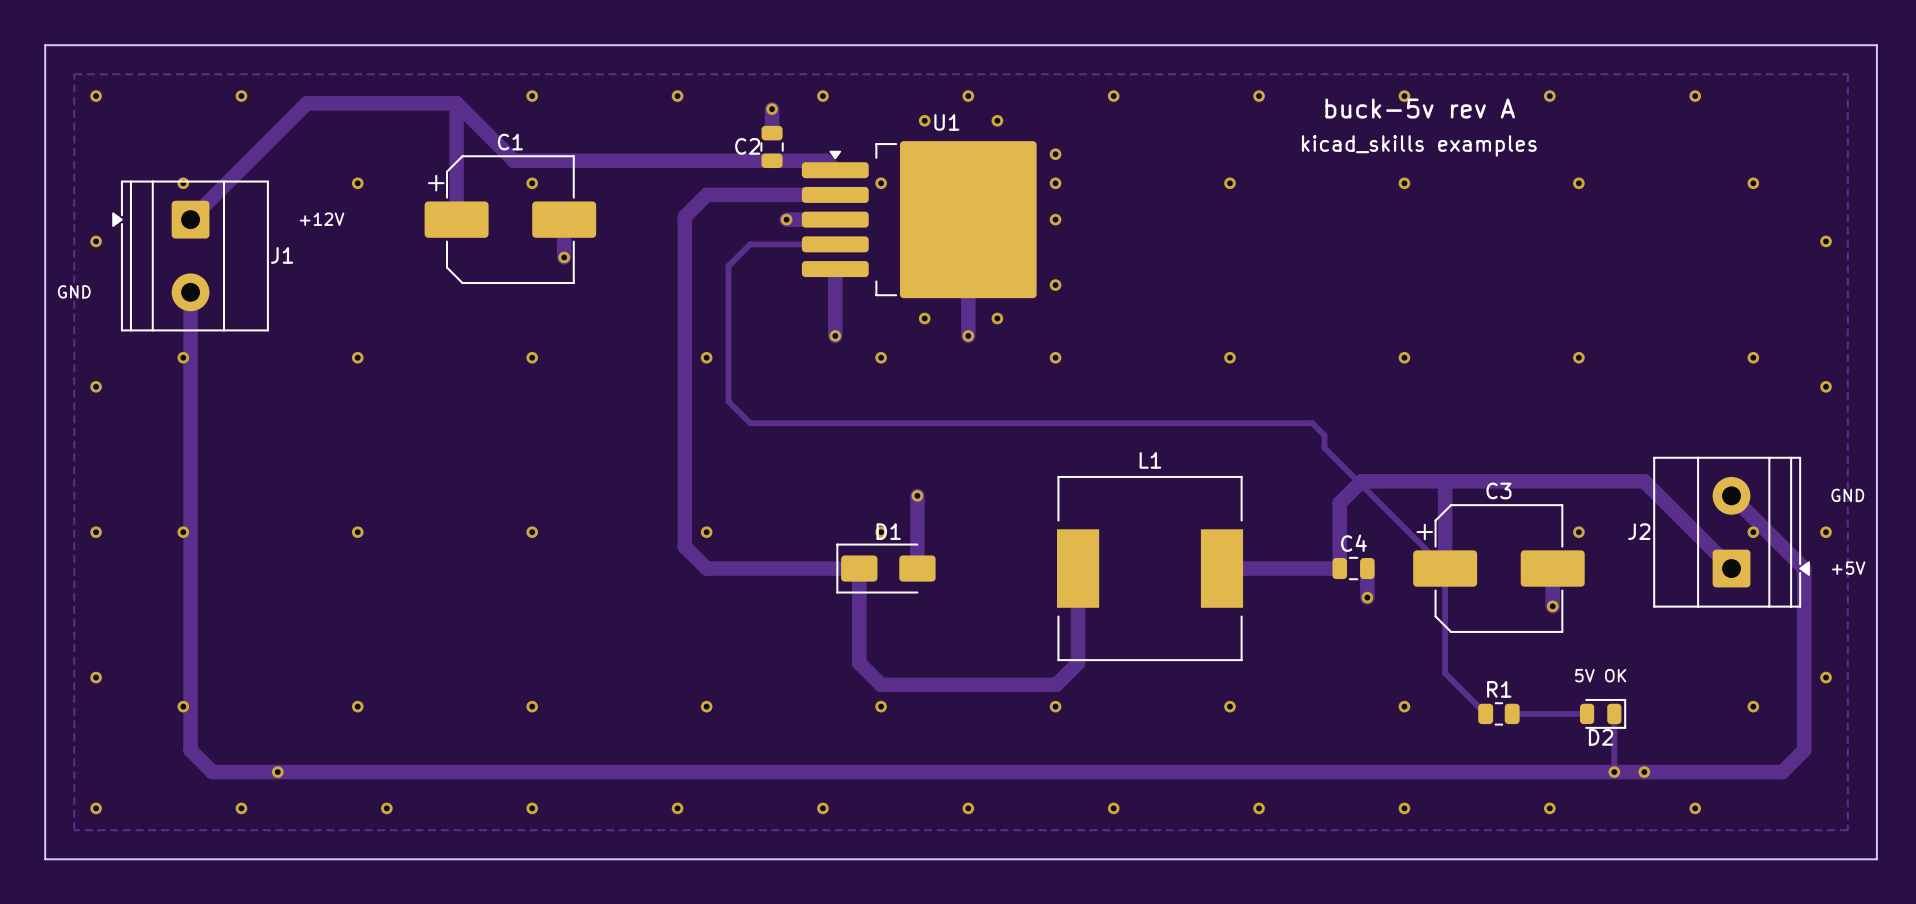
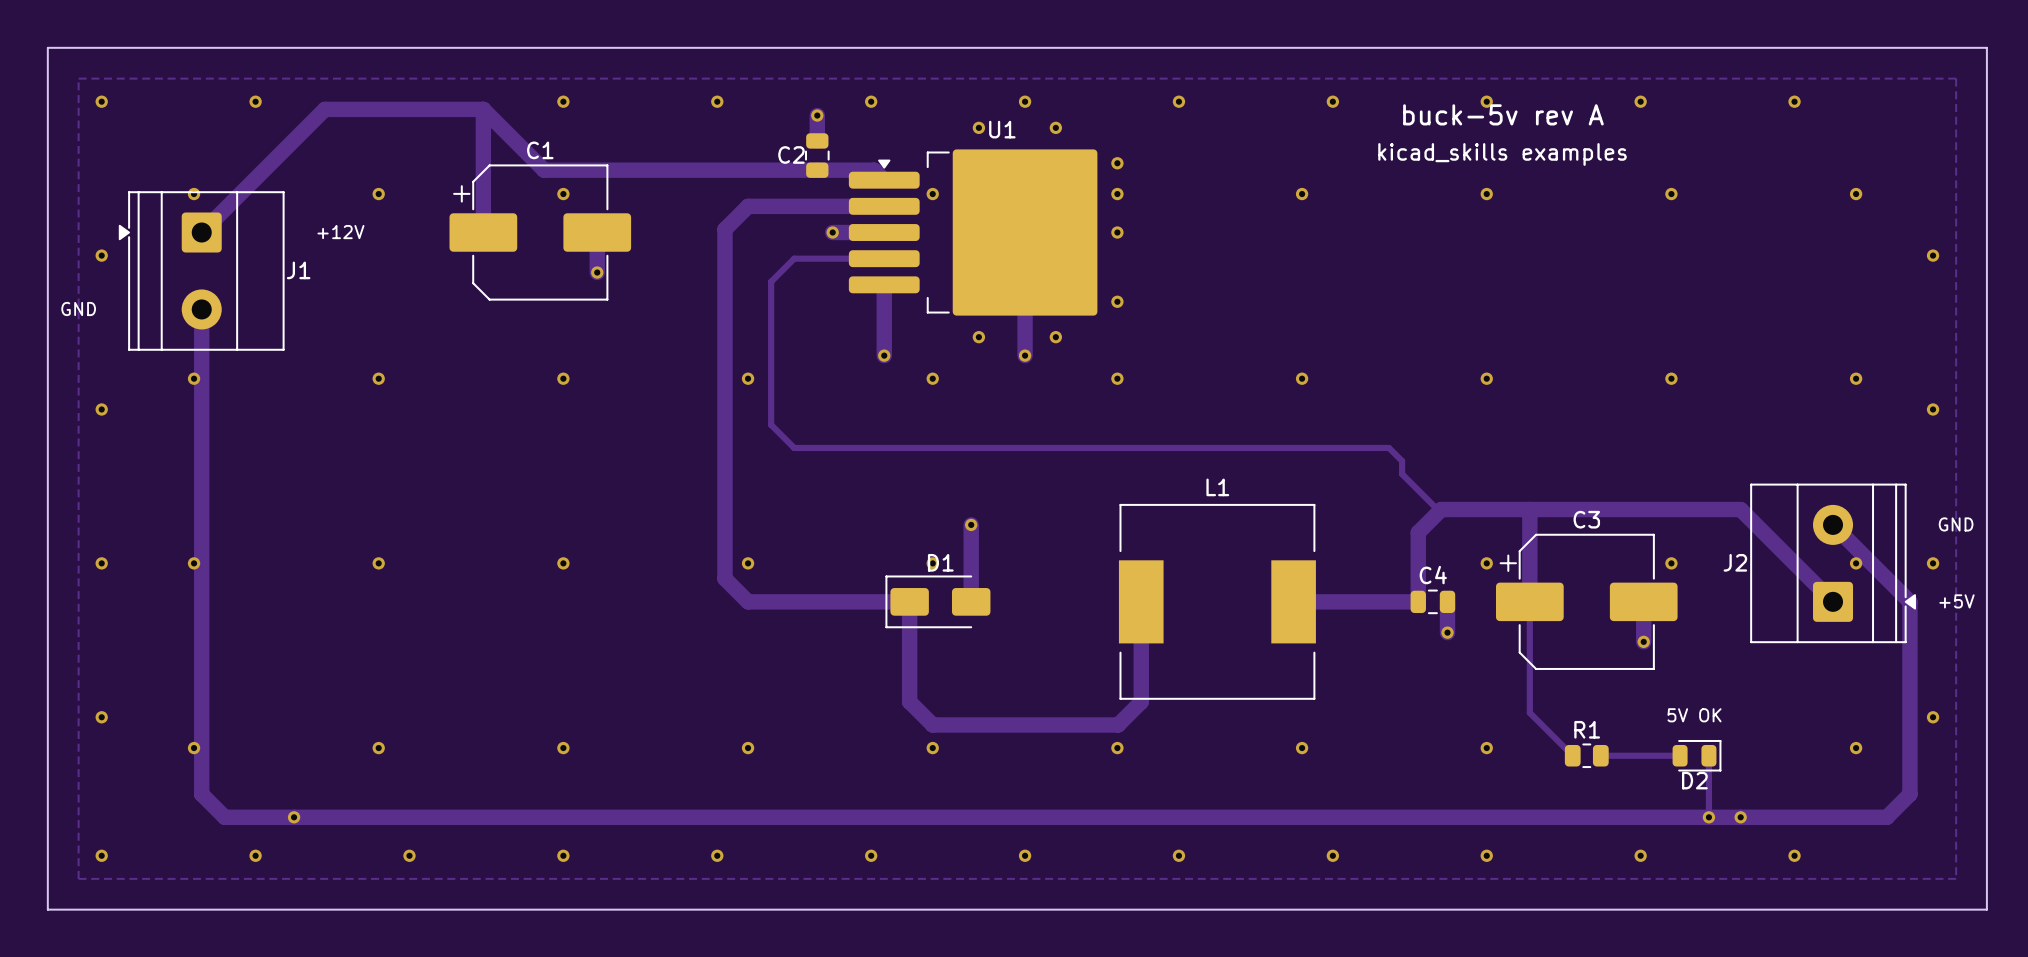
track: (1357, 481) (1445, 568) -> none
via: none -> (1486, 563)

